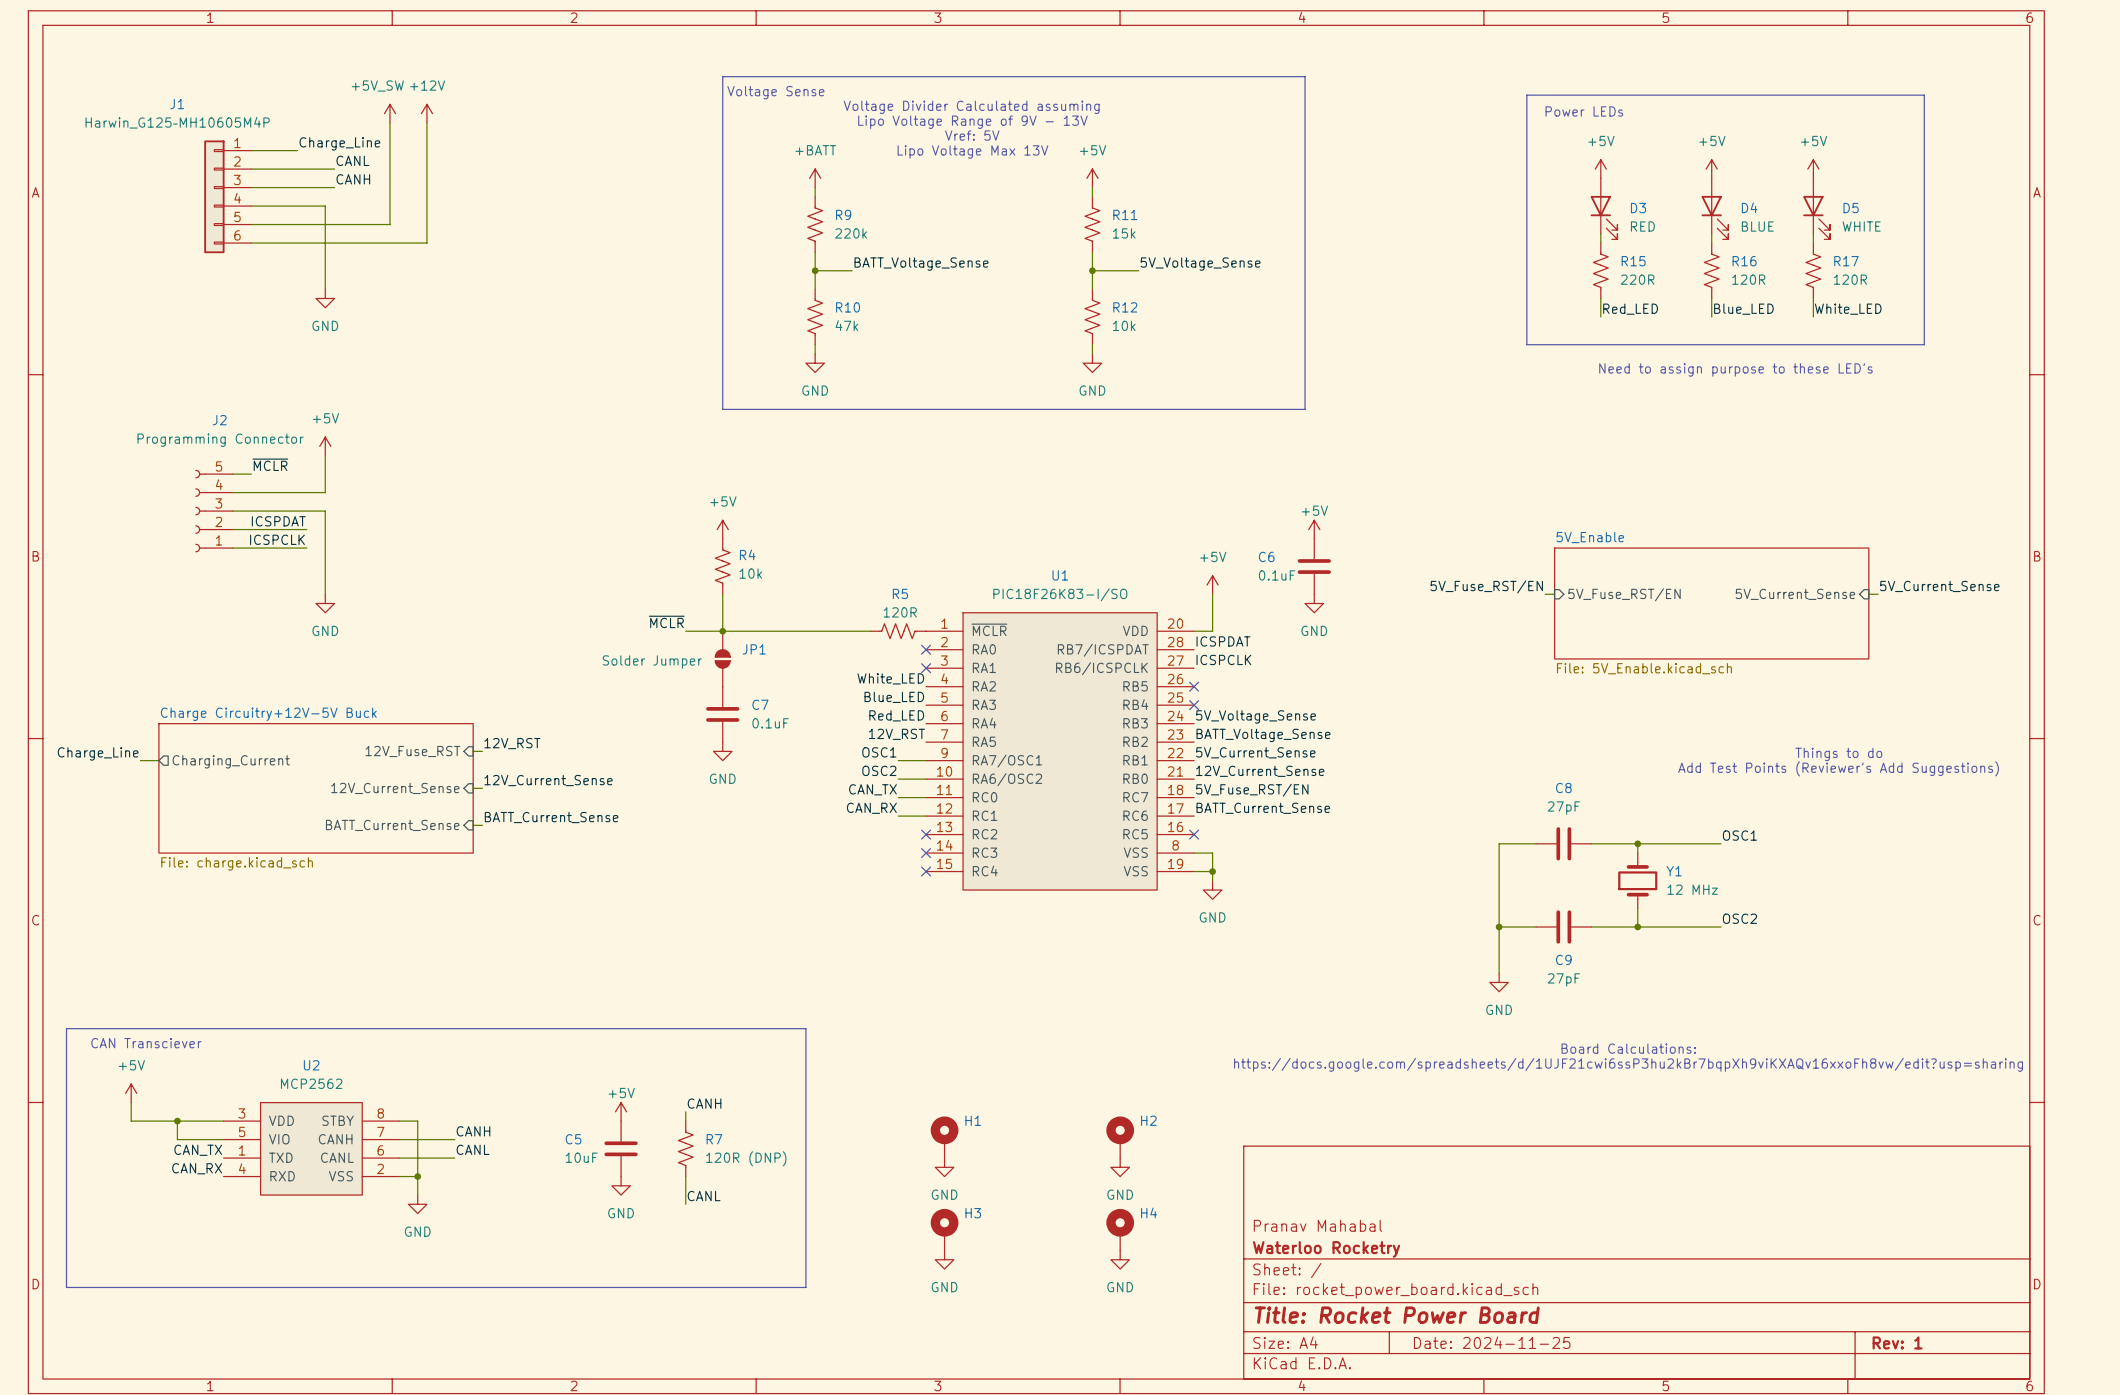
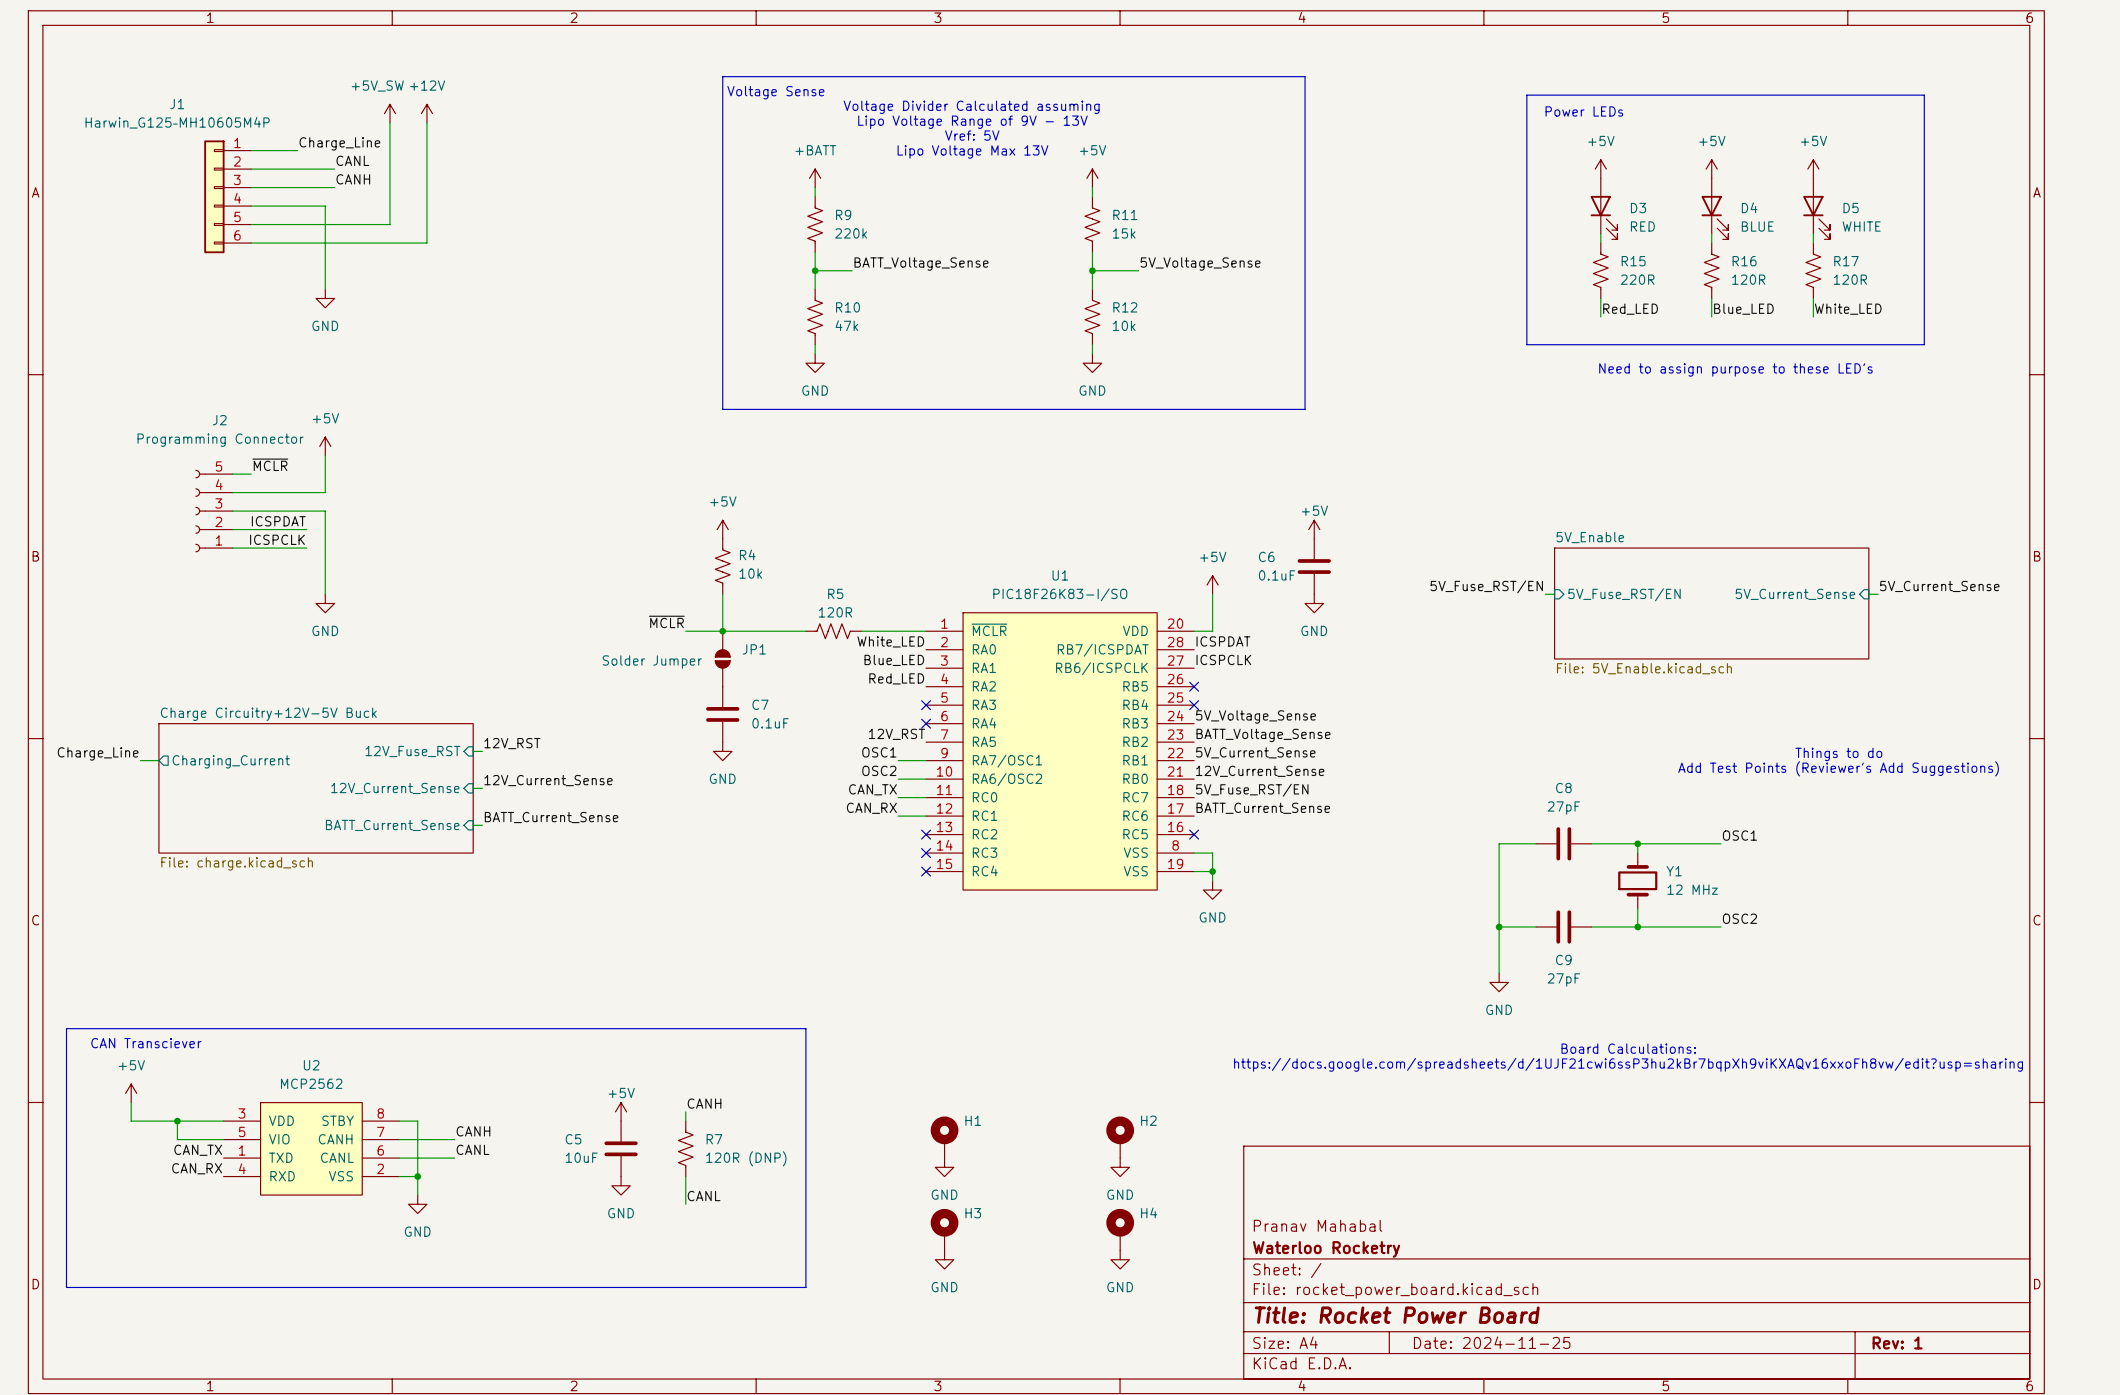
R5 position: (898, 631) -> (833, 631)
label: none -> White_LED (890, 641)
no-connect mark: (926, 649) -> none
no-connect mark: (926, 668) -> none
label: White_LED (890, 678) -> Red_LED (896, 678)
label position: Blue_LED (894, 697) -> Blue_LED (894, 660)
no-connect mark: none -> (926, 705)
label: Red_LED (896, 715) -> none
no-connect mark: none -> (926, 723)

